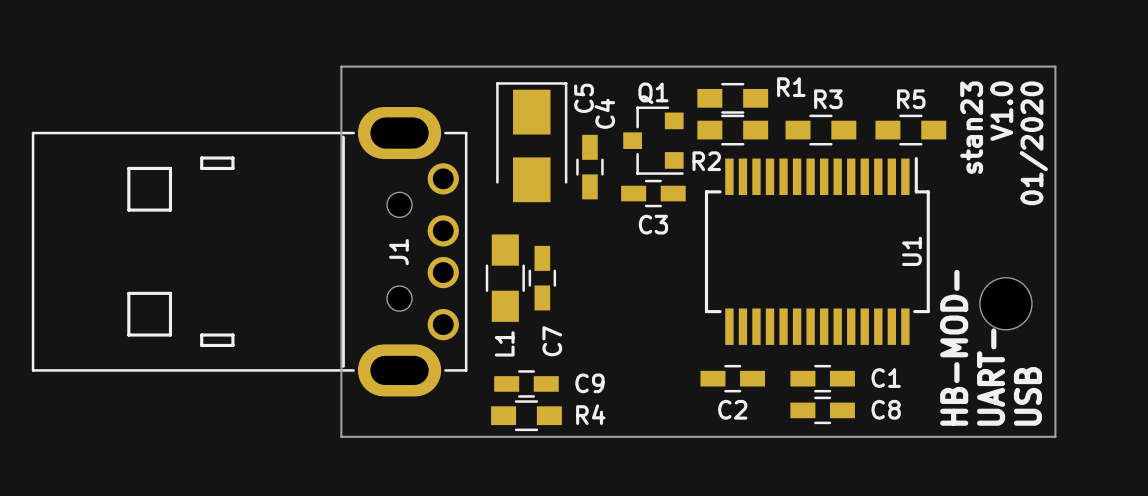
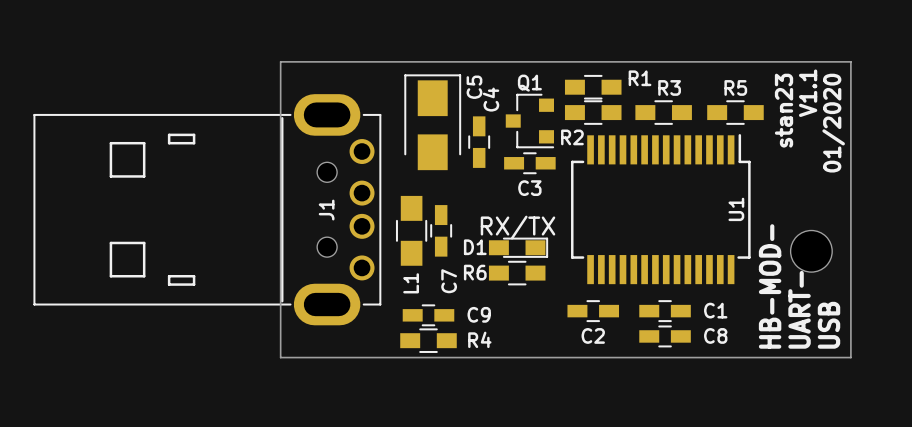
text: V1.0 (1001, 111) -> V1.1 (808, 93)
D1: none -> RX/TX (518, 247)
R6: none -> (517, 273)

